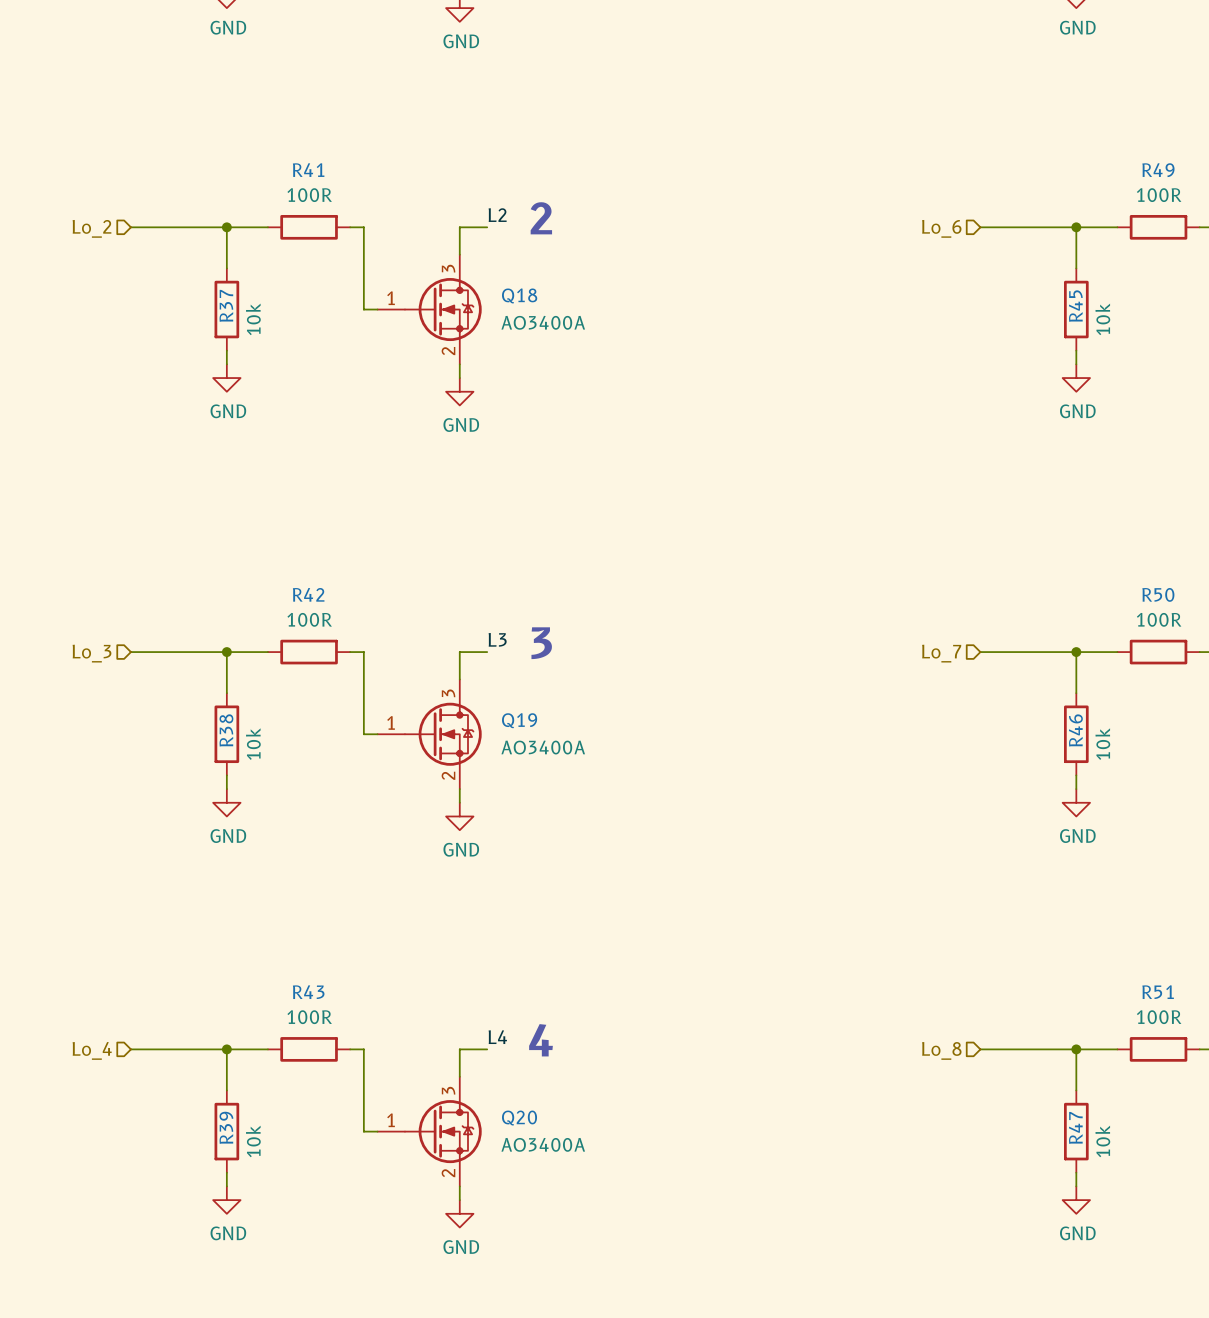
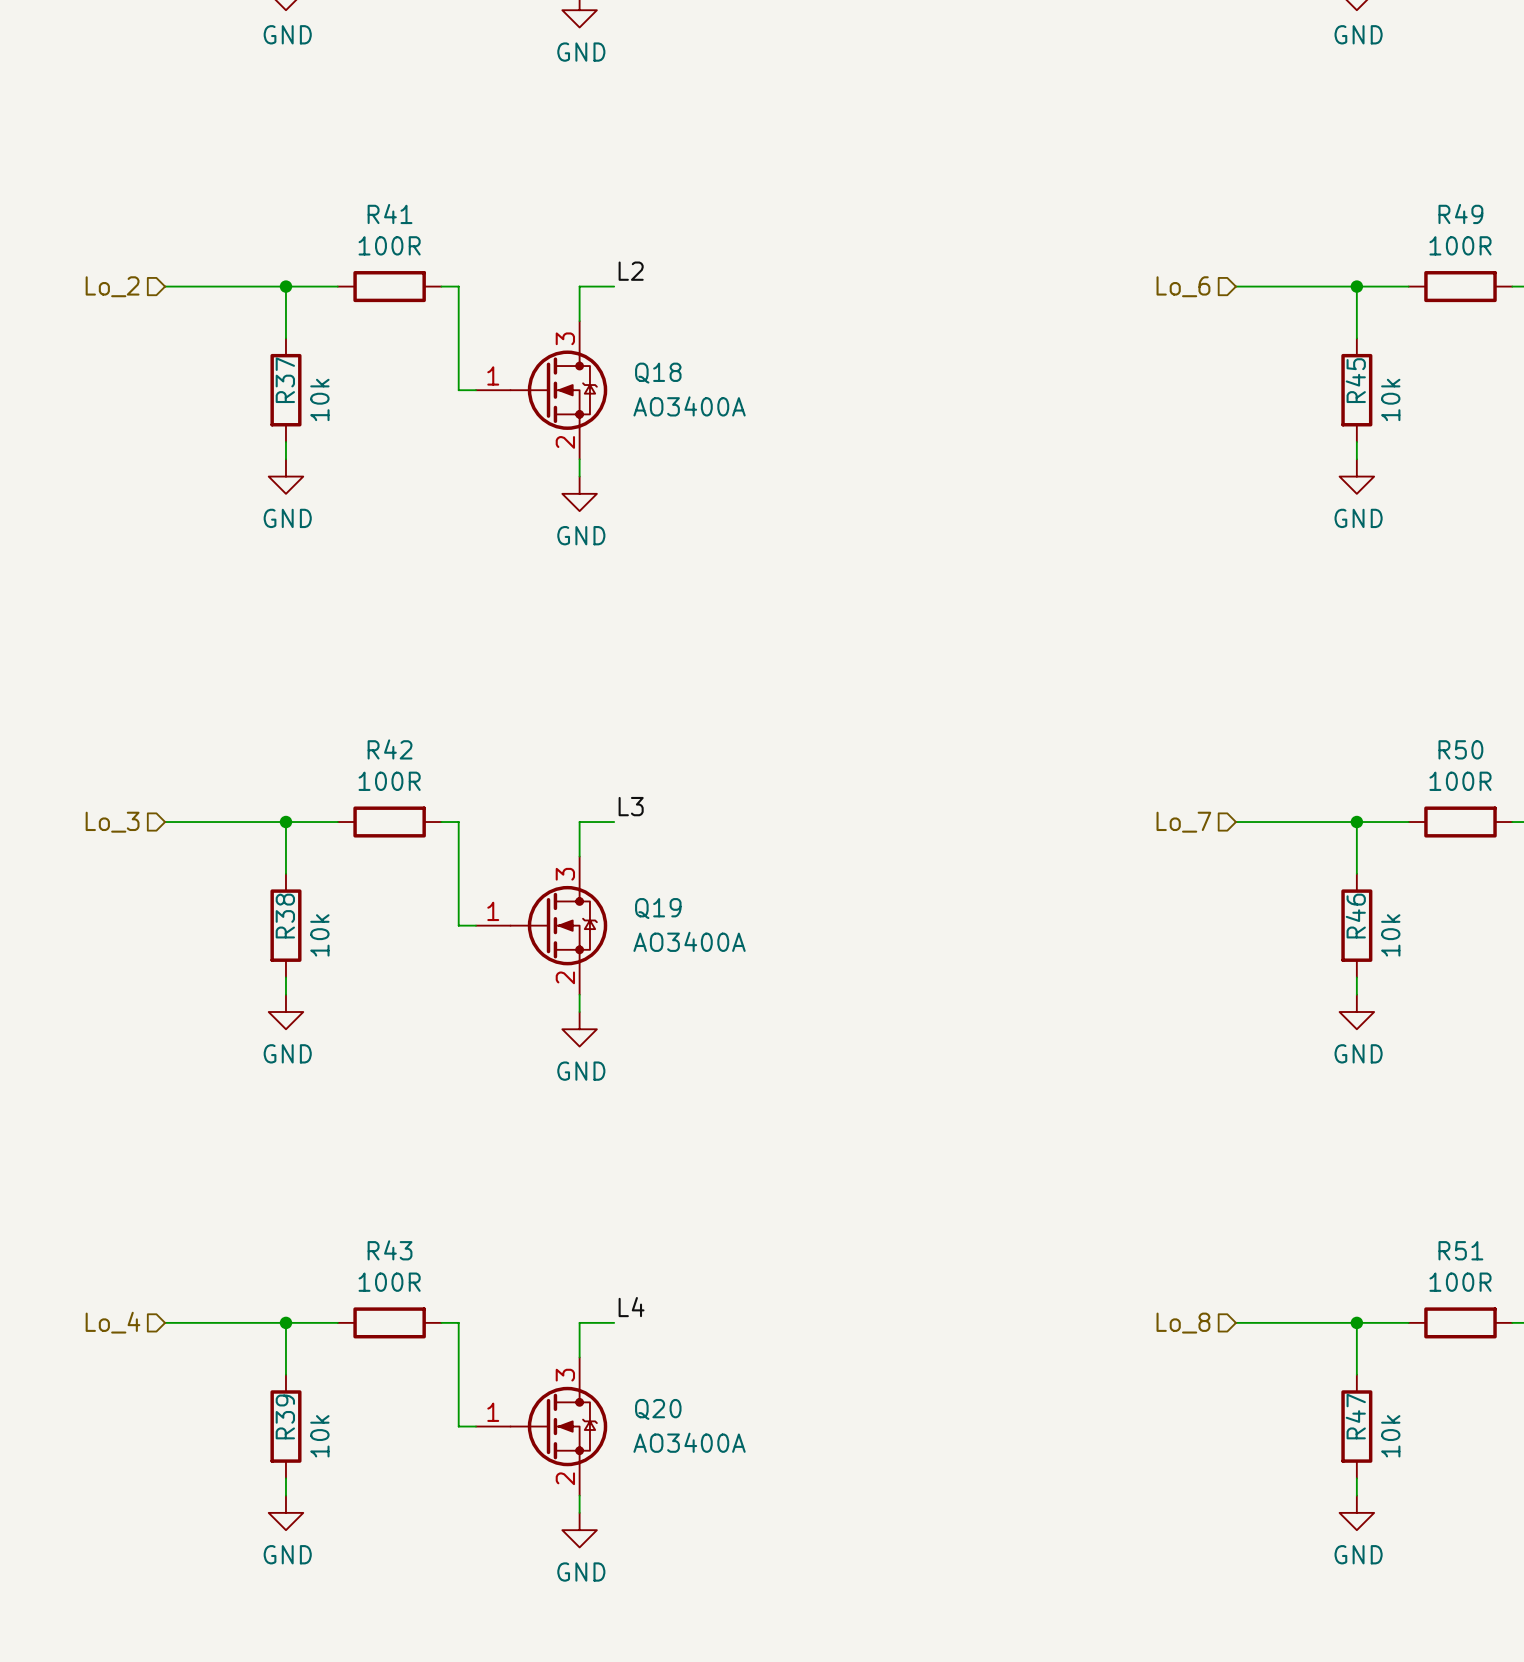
text: 2 (541, 218) -> none
text: 3 (541, 643) -> none
text: 4 (541, 1040) -> none

